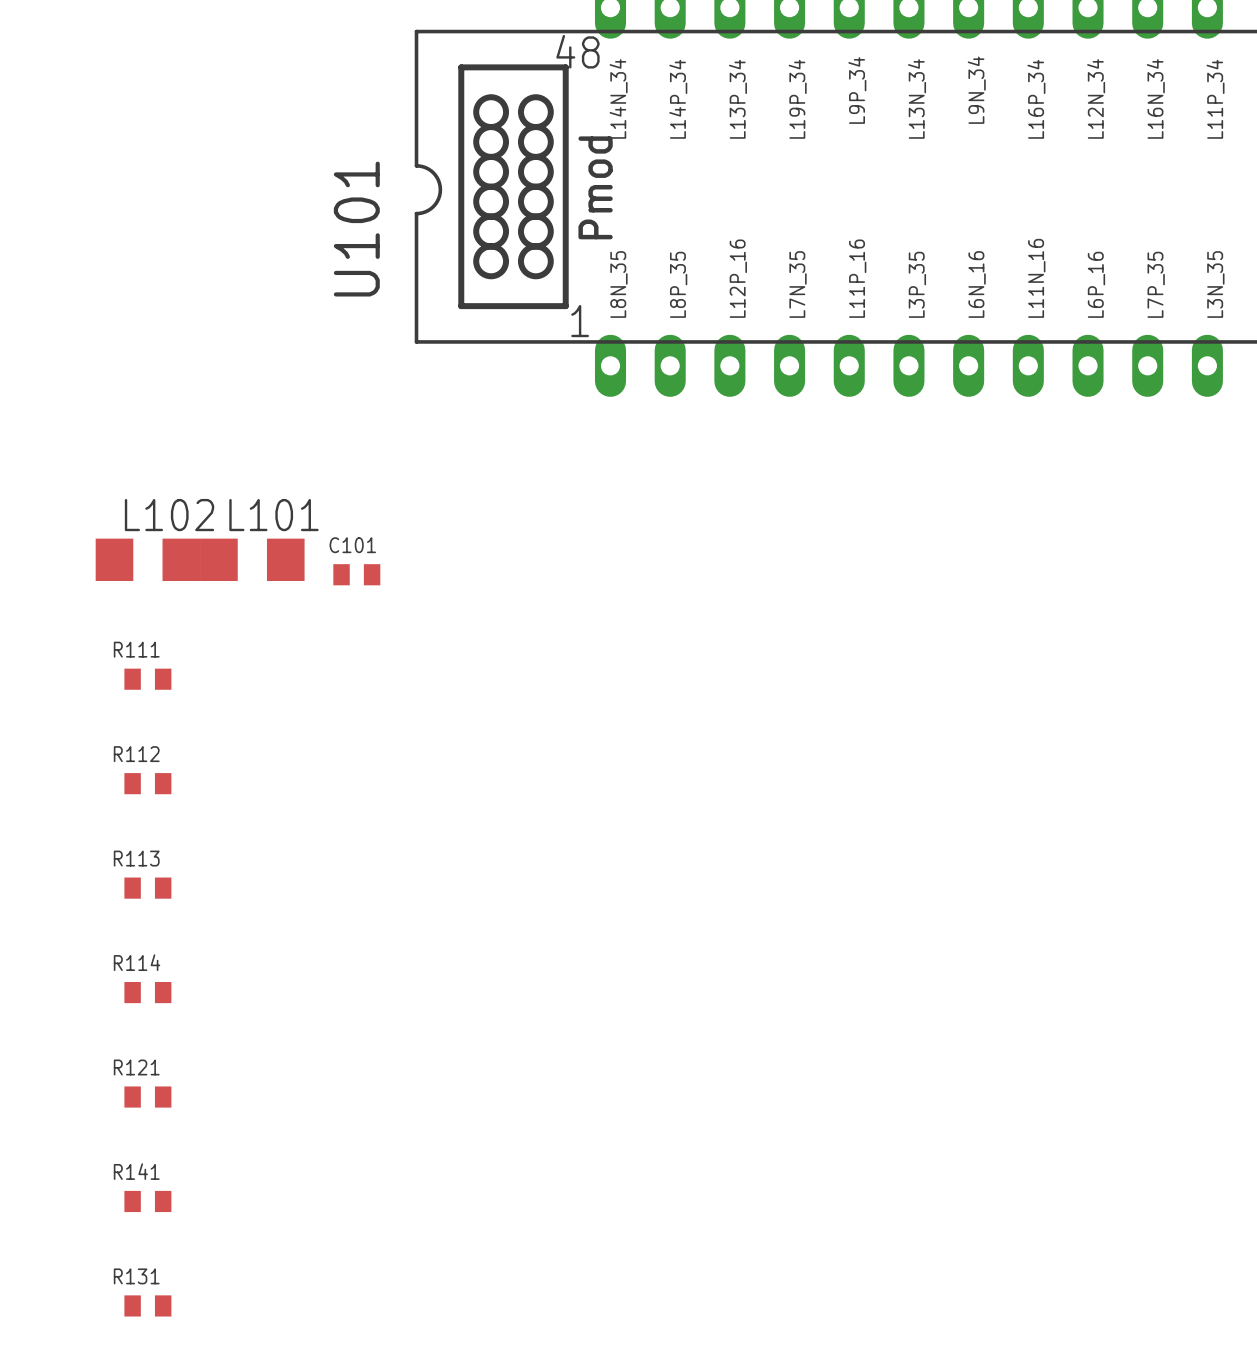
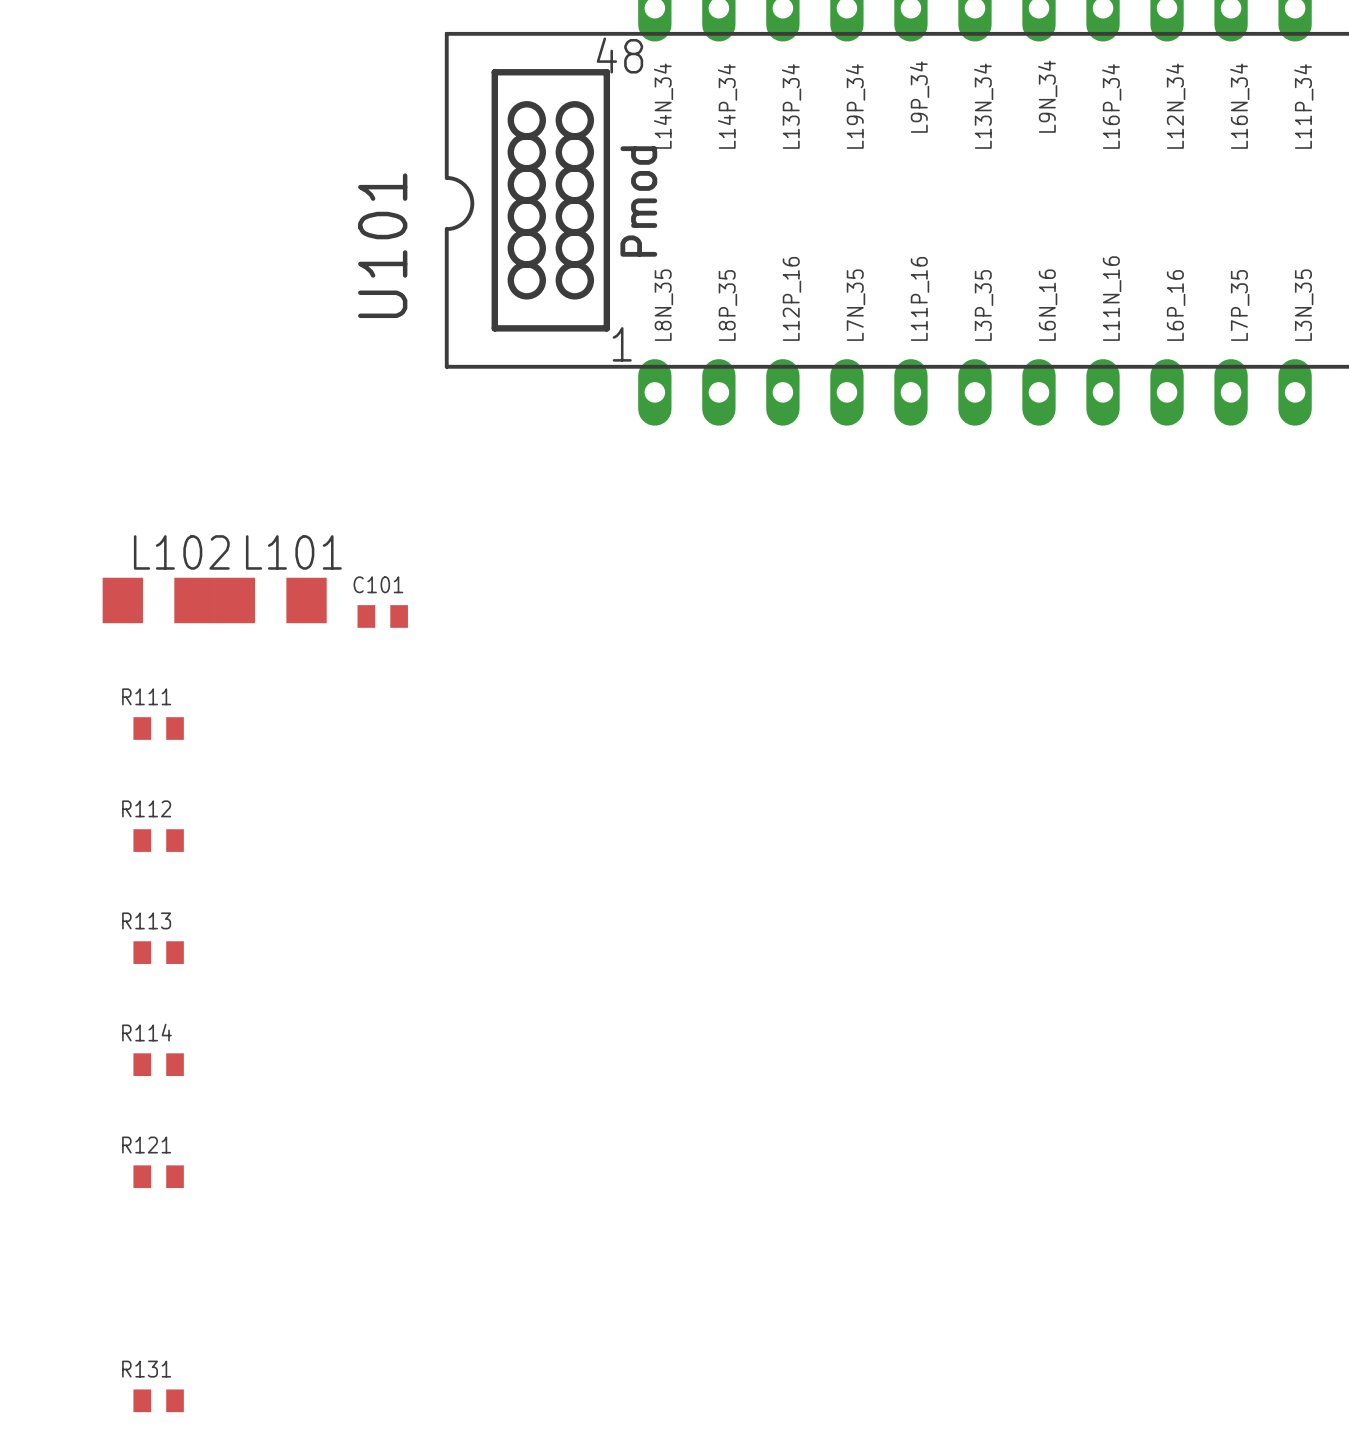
R141: (147, 1201) -> none

